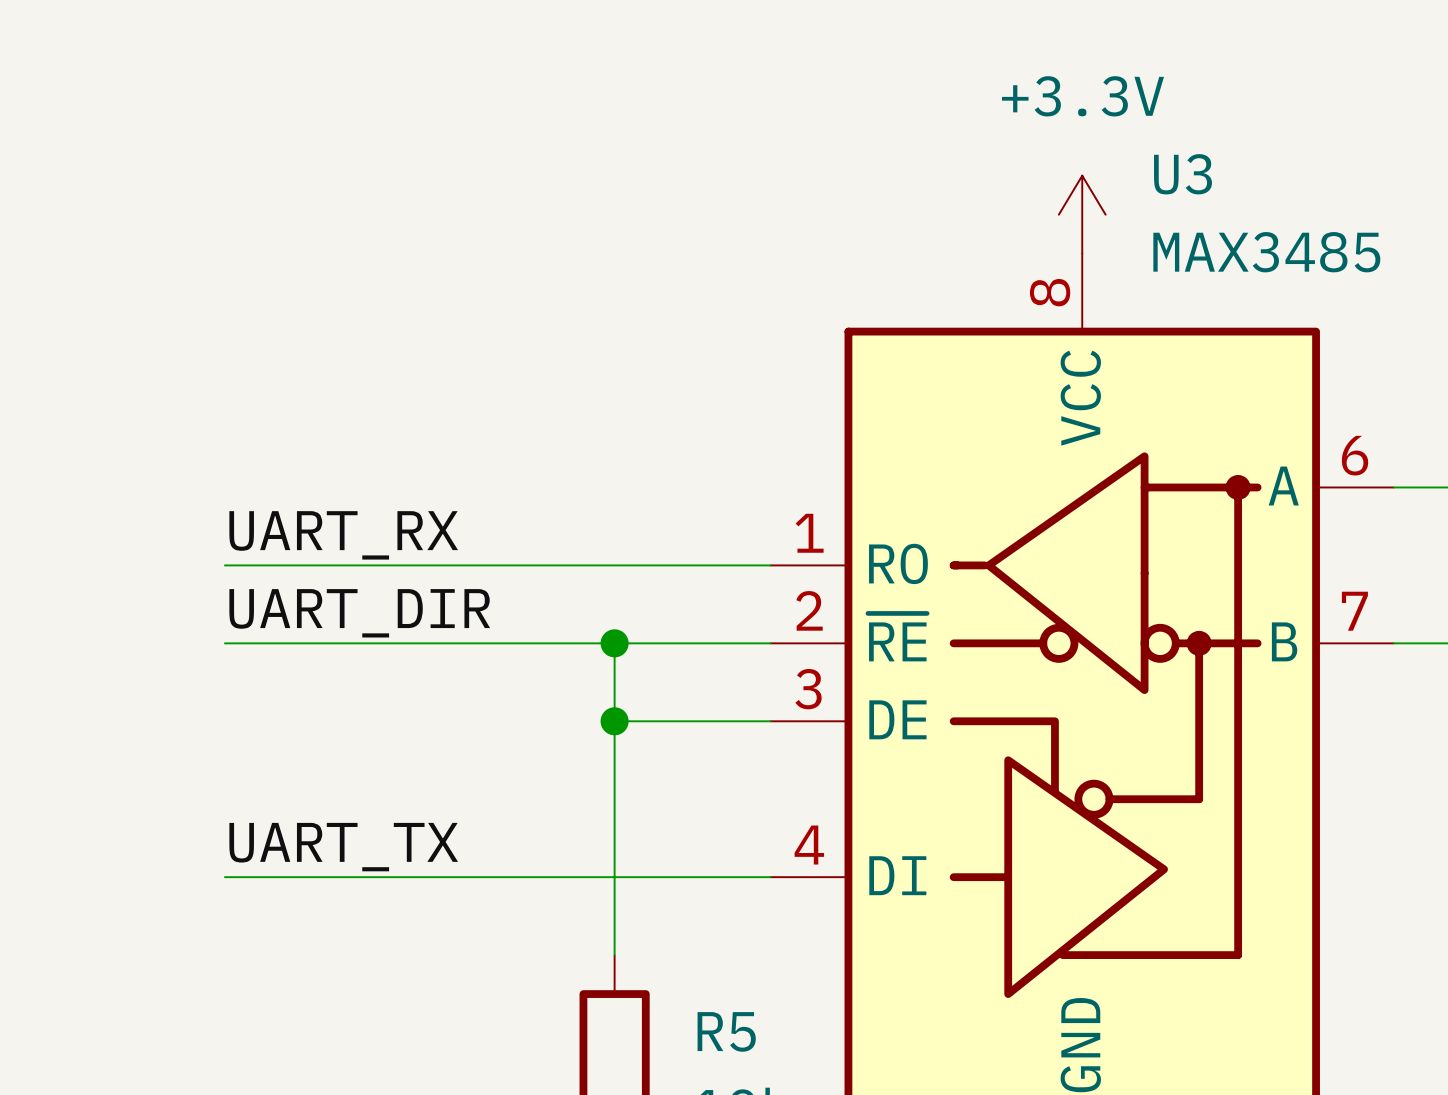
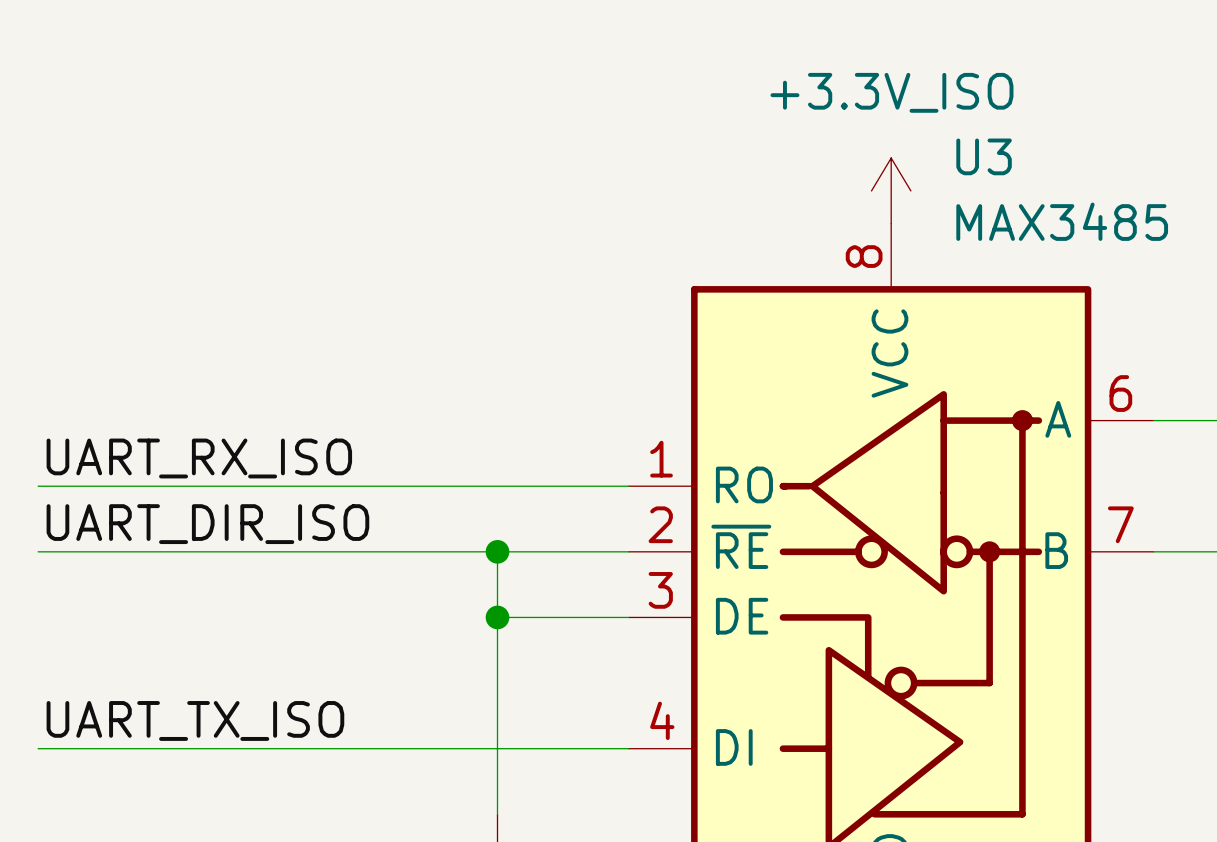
power symbol: +3.3V (1082, 214) -> +3.3V_ISO (891, 190)
label: none -> UART_RX_ISO (199, 458)
label: UART_RX (343, 535) -> none
wire: none -> (38, 486) (169, 486)
label: none -> UART_DIR_ISO (207, 524)
label: UART_DIR (359, 613) -> none
wire: none -> (38, 551) (169, 551)
label: UART_TX (343, 847) -> UART_TX_ISO (195, 720)
wire: none -> (38, 748) (169, 748)

